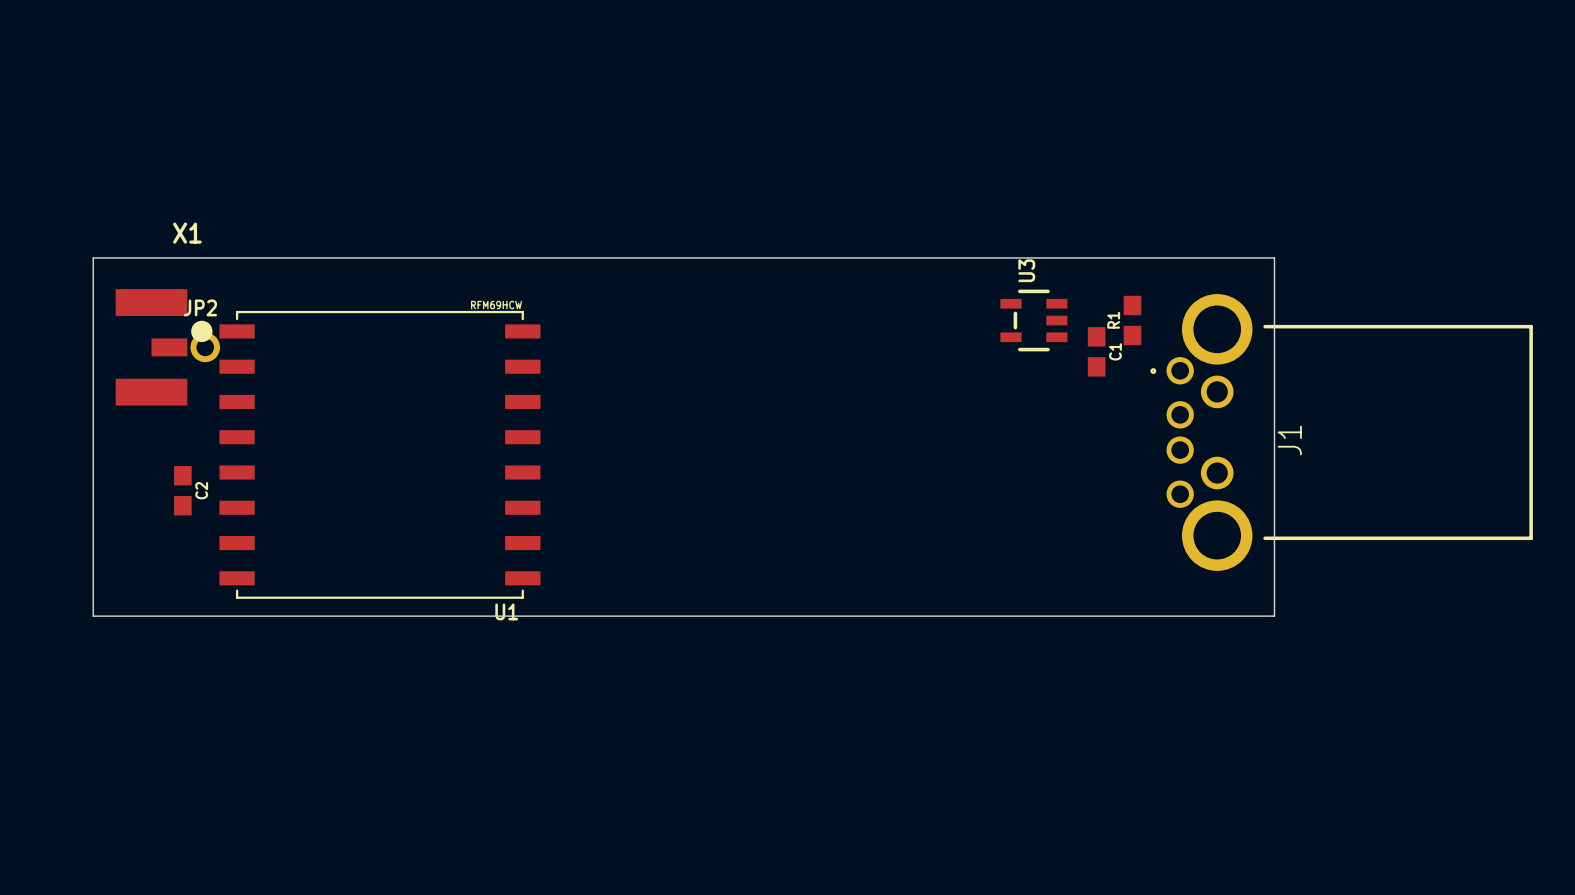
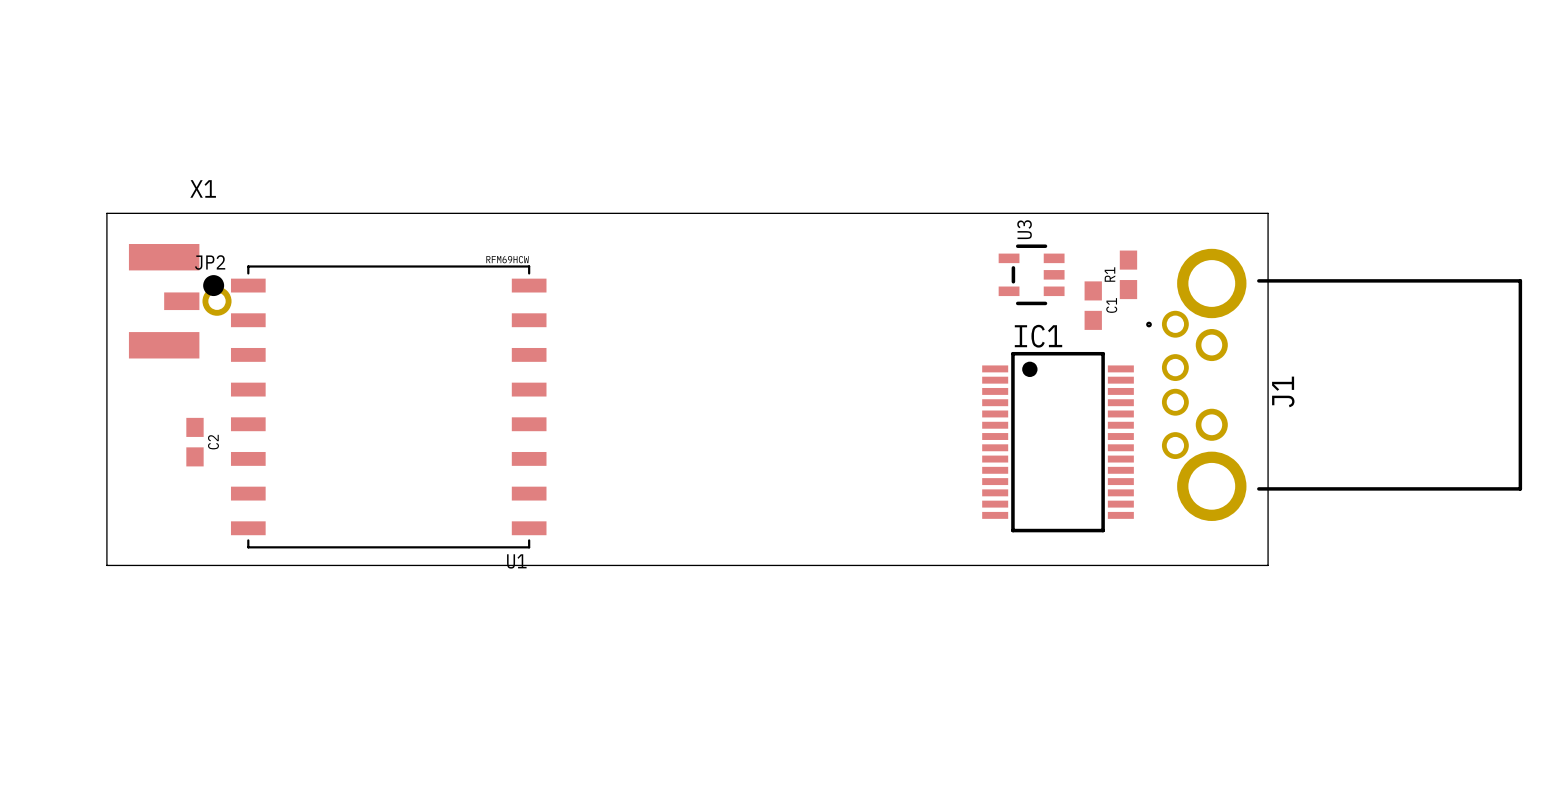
IC1: none -> (1058, 442)

